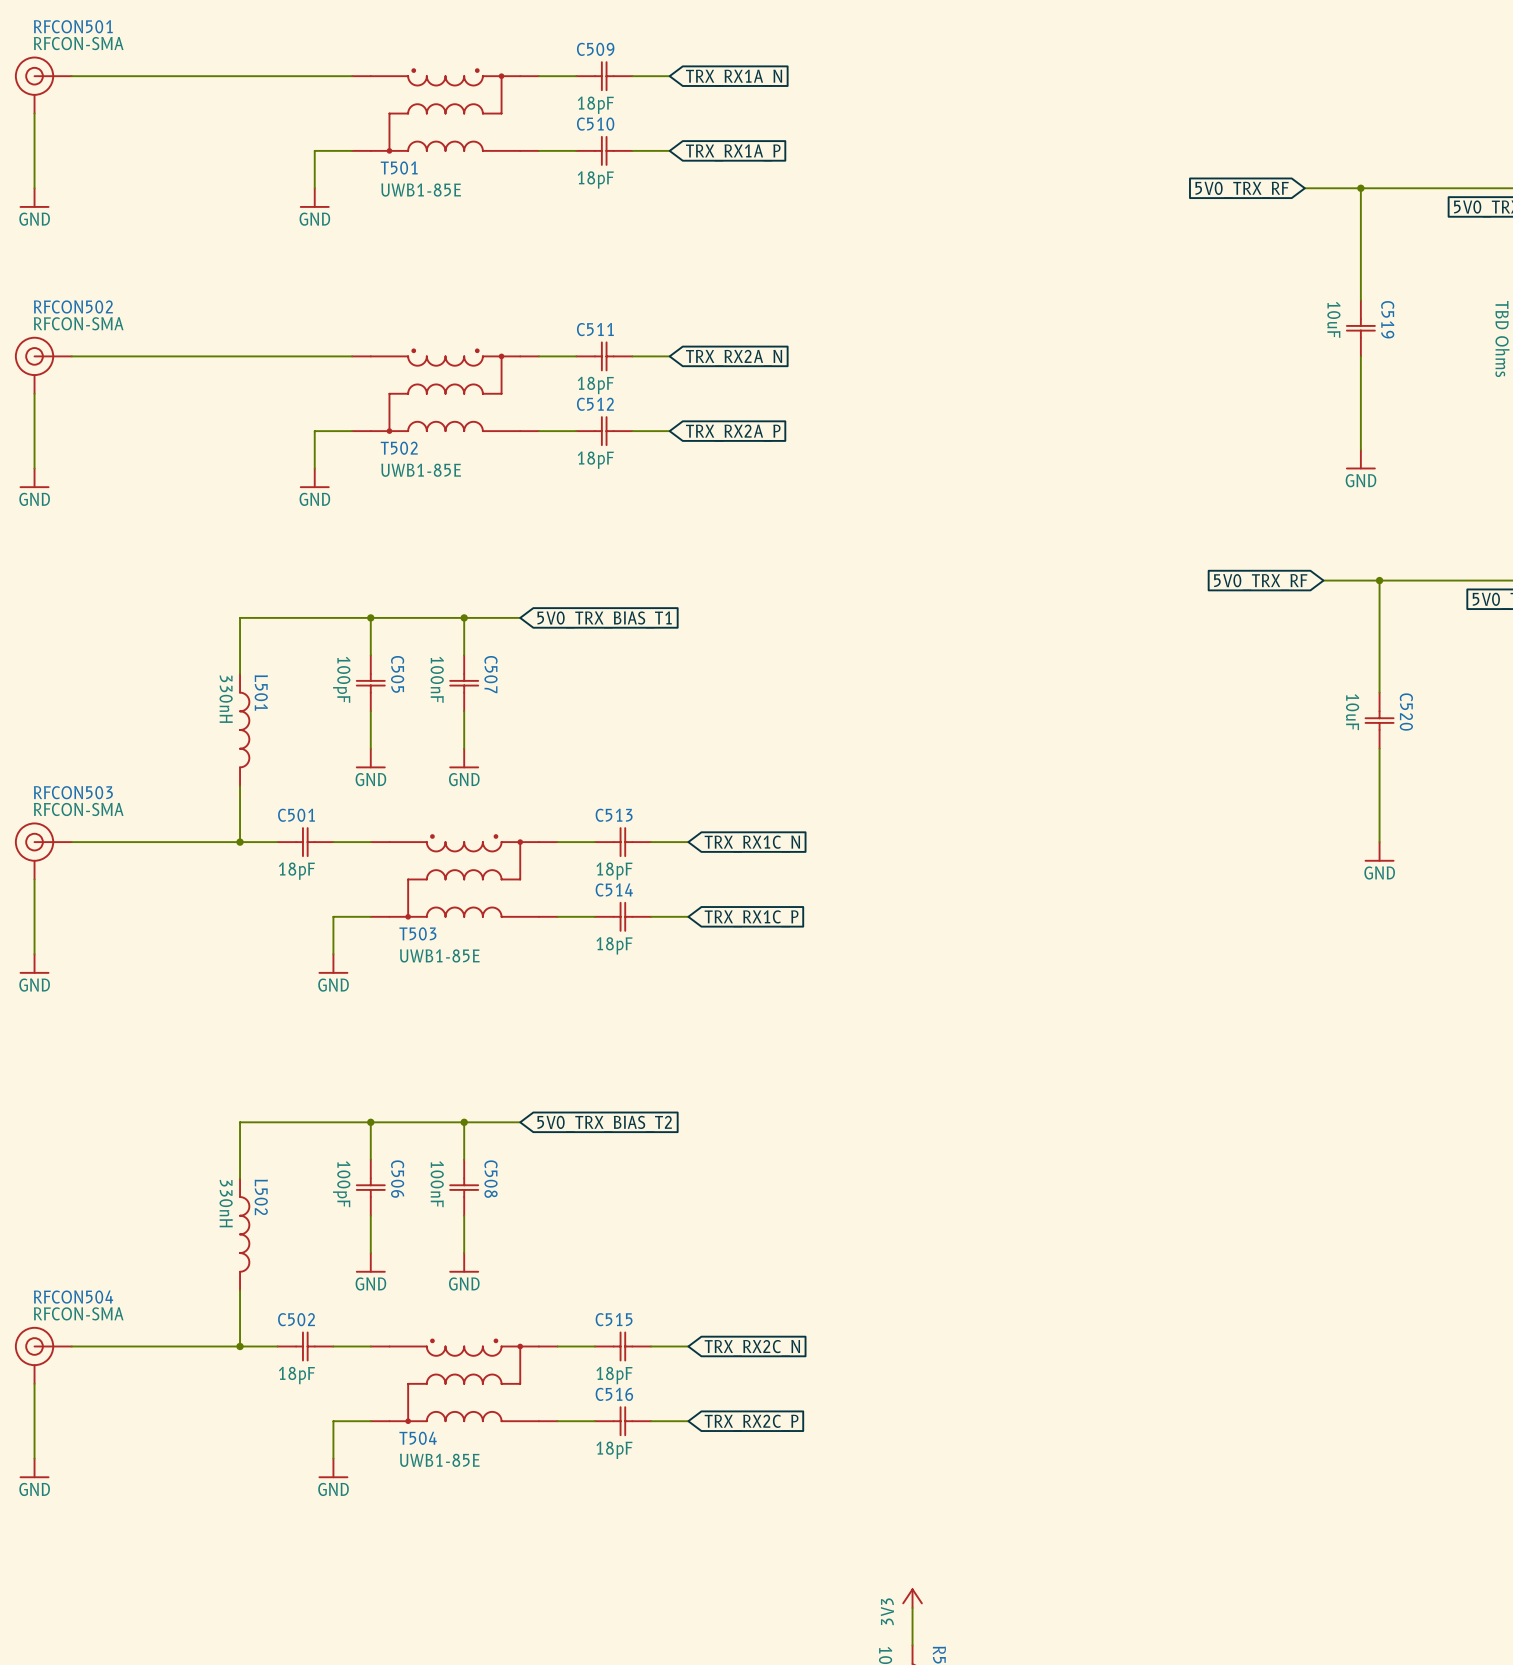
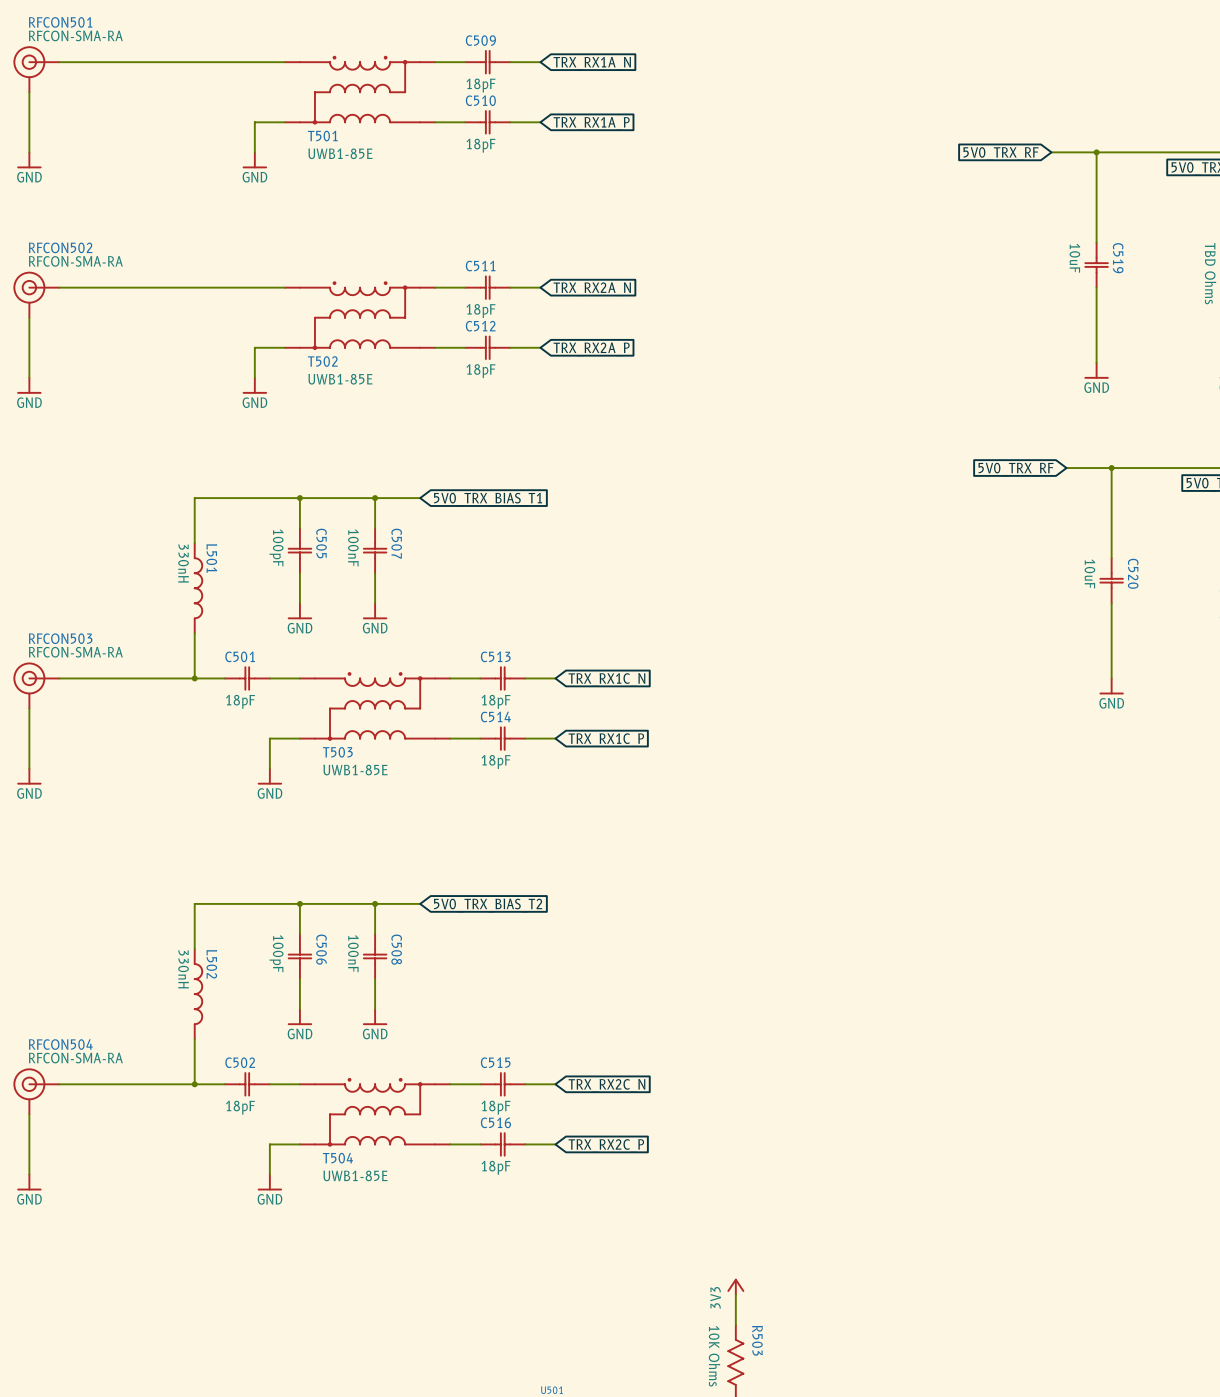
RFCON501 value: RFCON-SMA (78, 43) -> RFCON-SMA-RA (75, 35)
RFCON502 value: RFCON-SMA (78, 323) -> RFCON-SMA-RA (75, 261)
RFCON503 value: RFCON-SMA (78, 809) -> RFCON-SMA-RA (75, 652)
RFCON504 value: RFCON-SMA (78, 1313) -> RFCON-SMA-RA (75, 1058)

